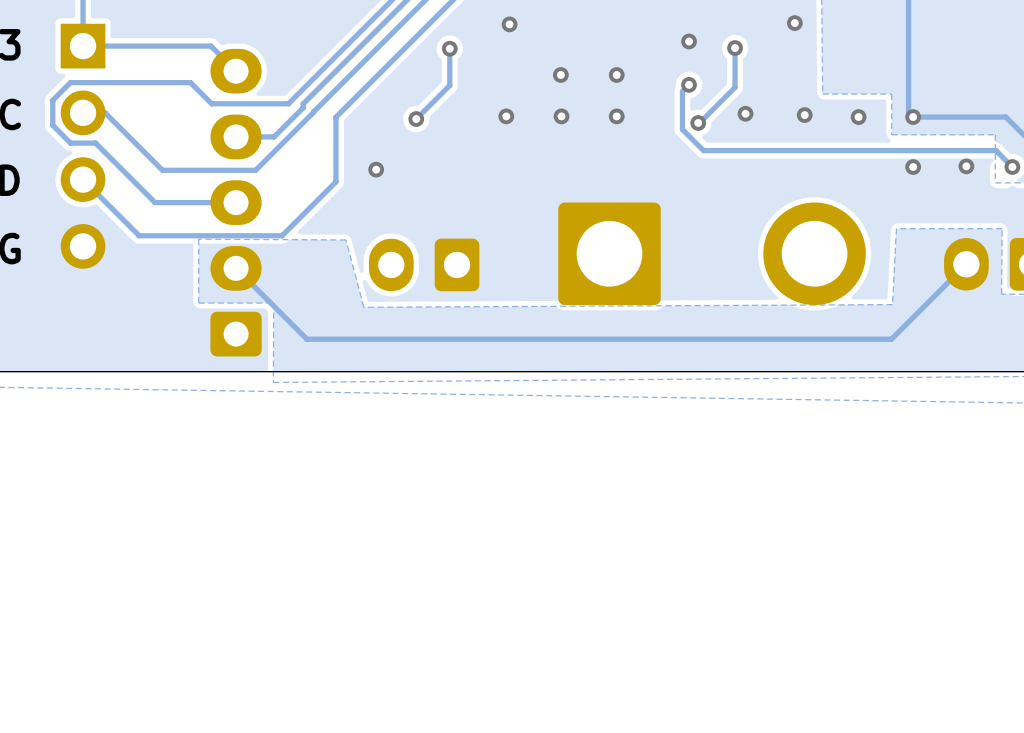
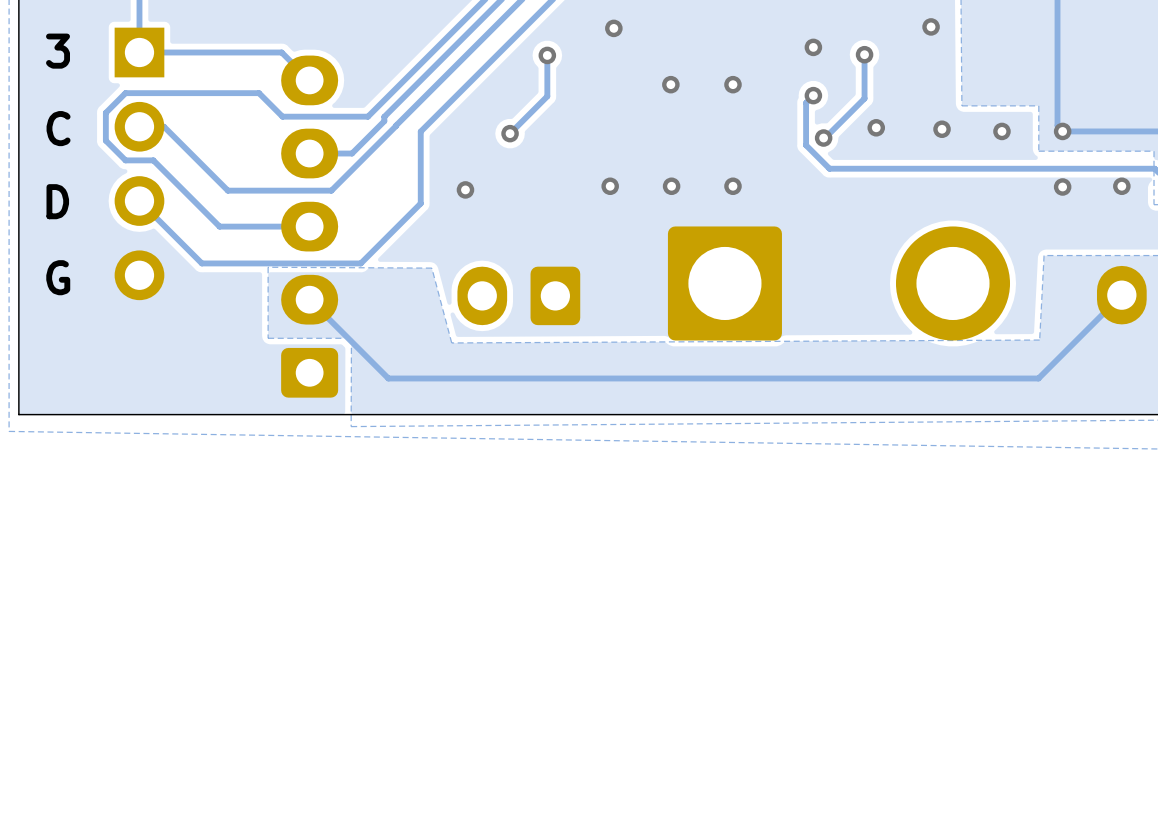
via: (506, 116) -> none
via: (561, 116) -> none
via: (616, 116) -> none
via: none -> (610, 186)
via: none -> (671, 186)
via: none -> (732, 186)

